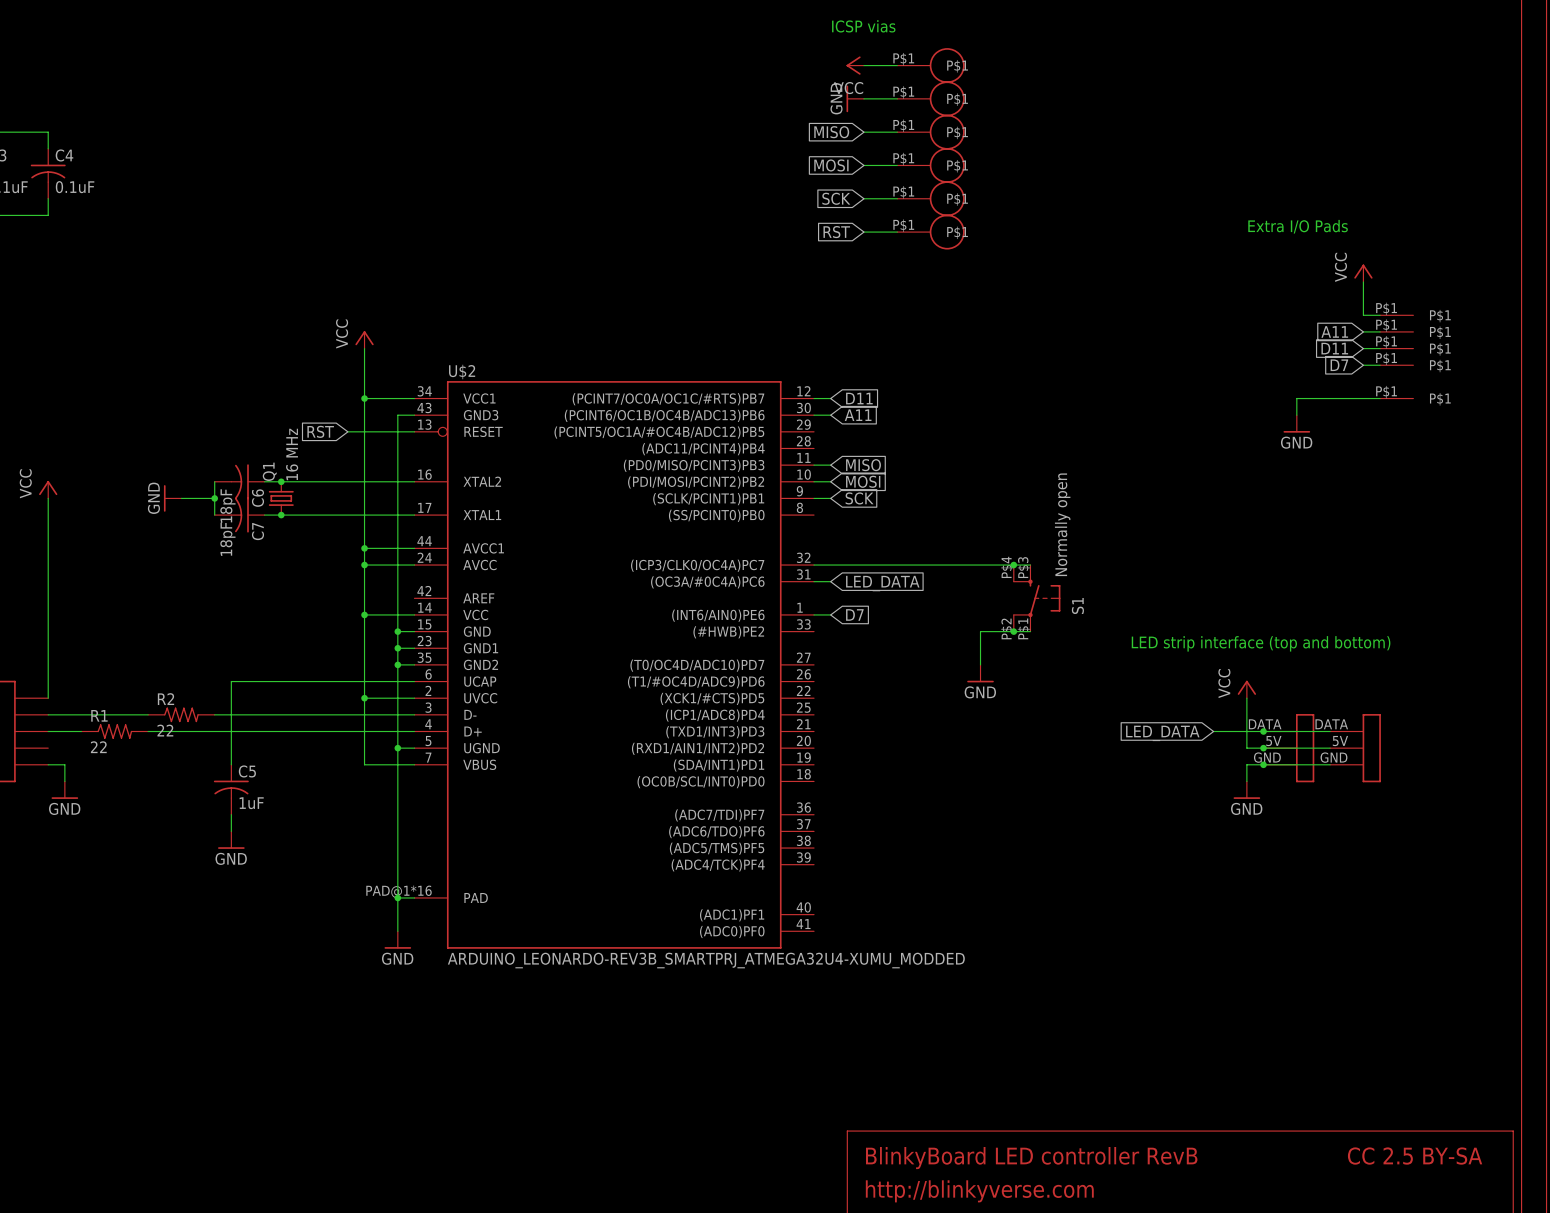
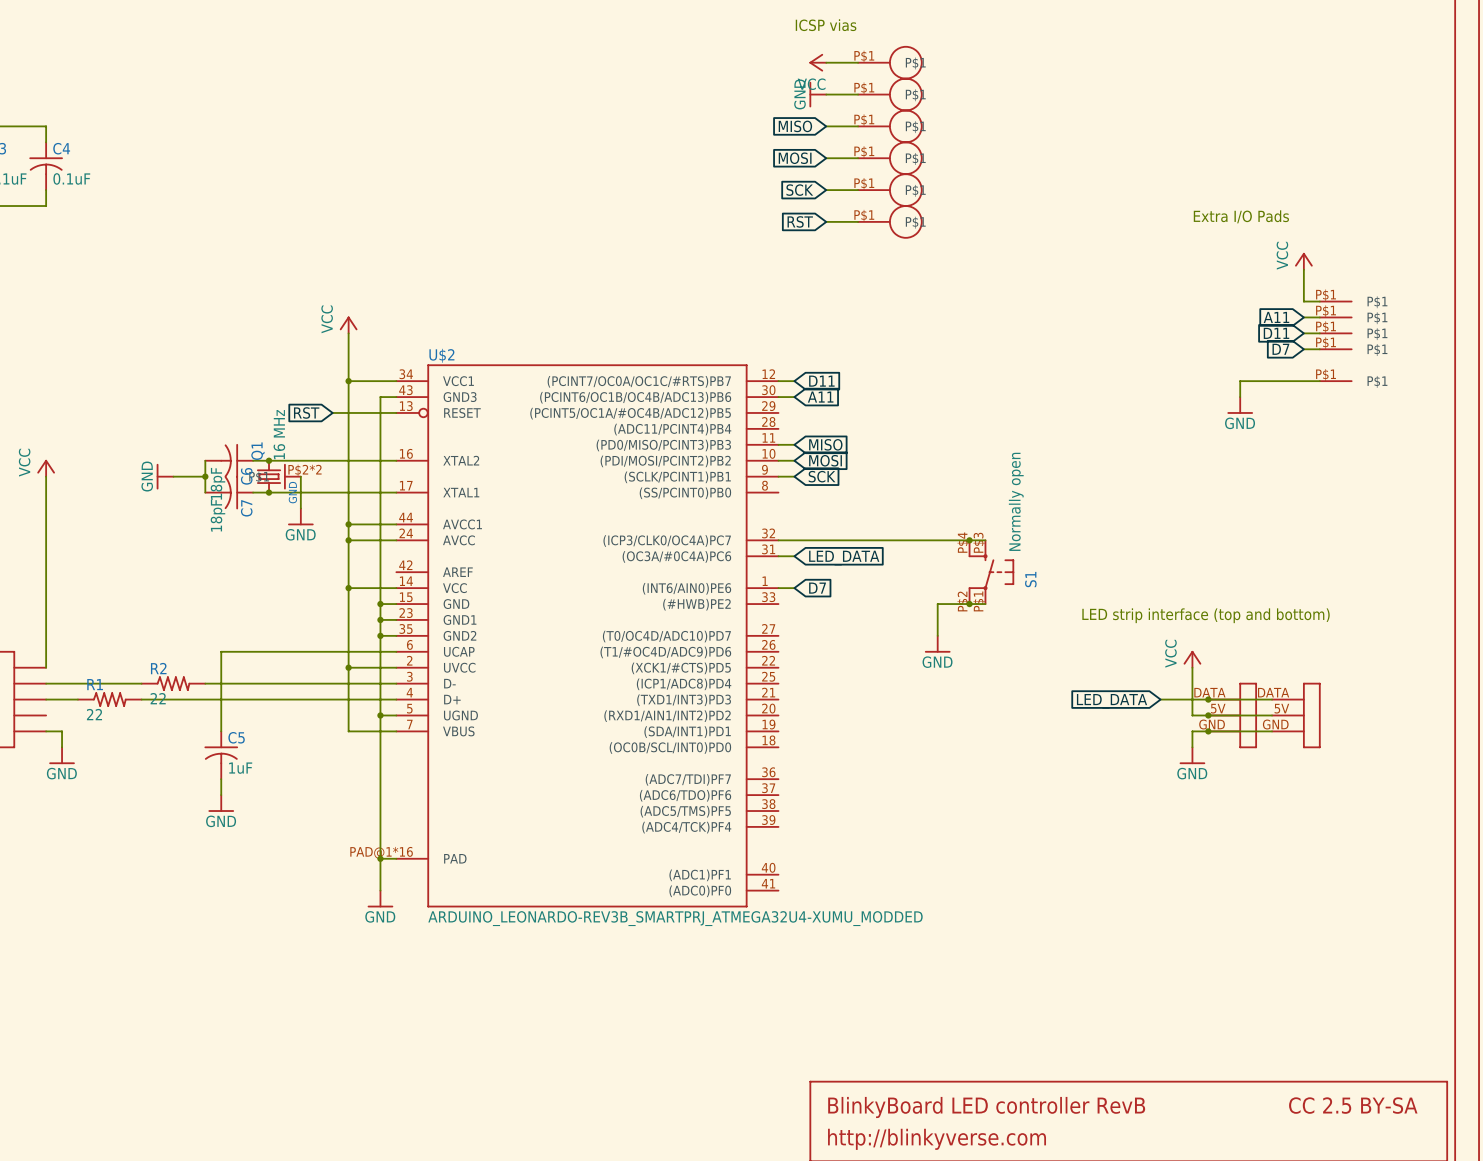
Q1 symbol: [268, 481, 294, 516] -> [257, 460, 301, 494]
wire: none -> (300, 476) (300, 508)
power symbol: none -> GND (300, 516)

